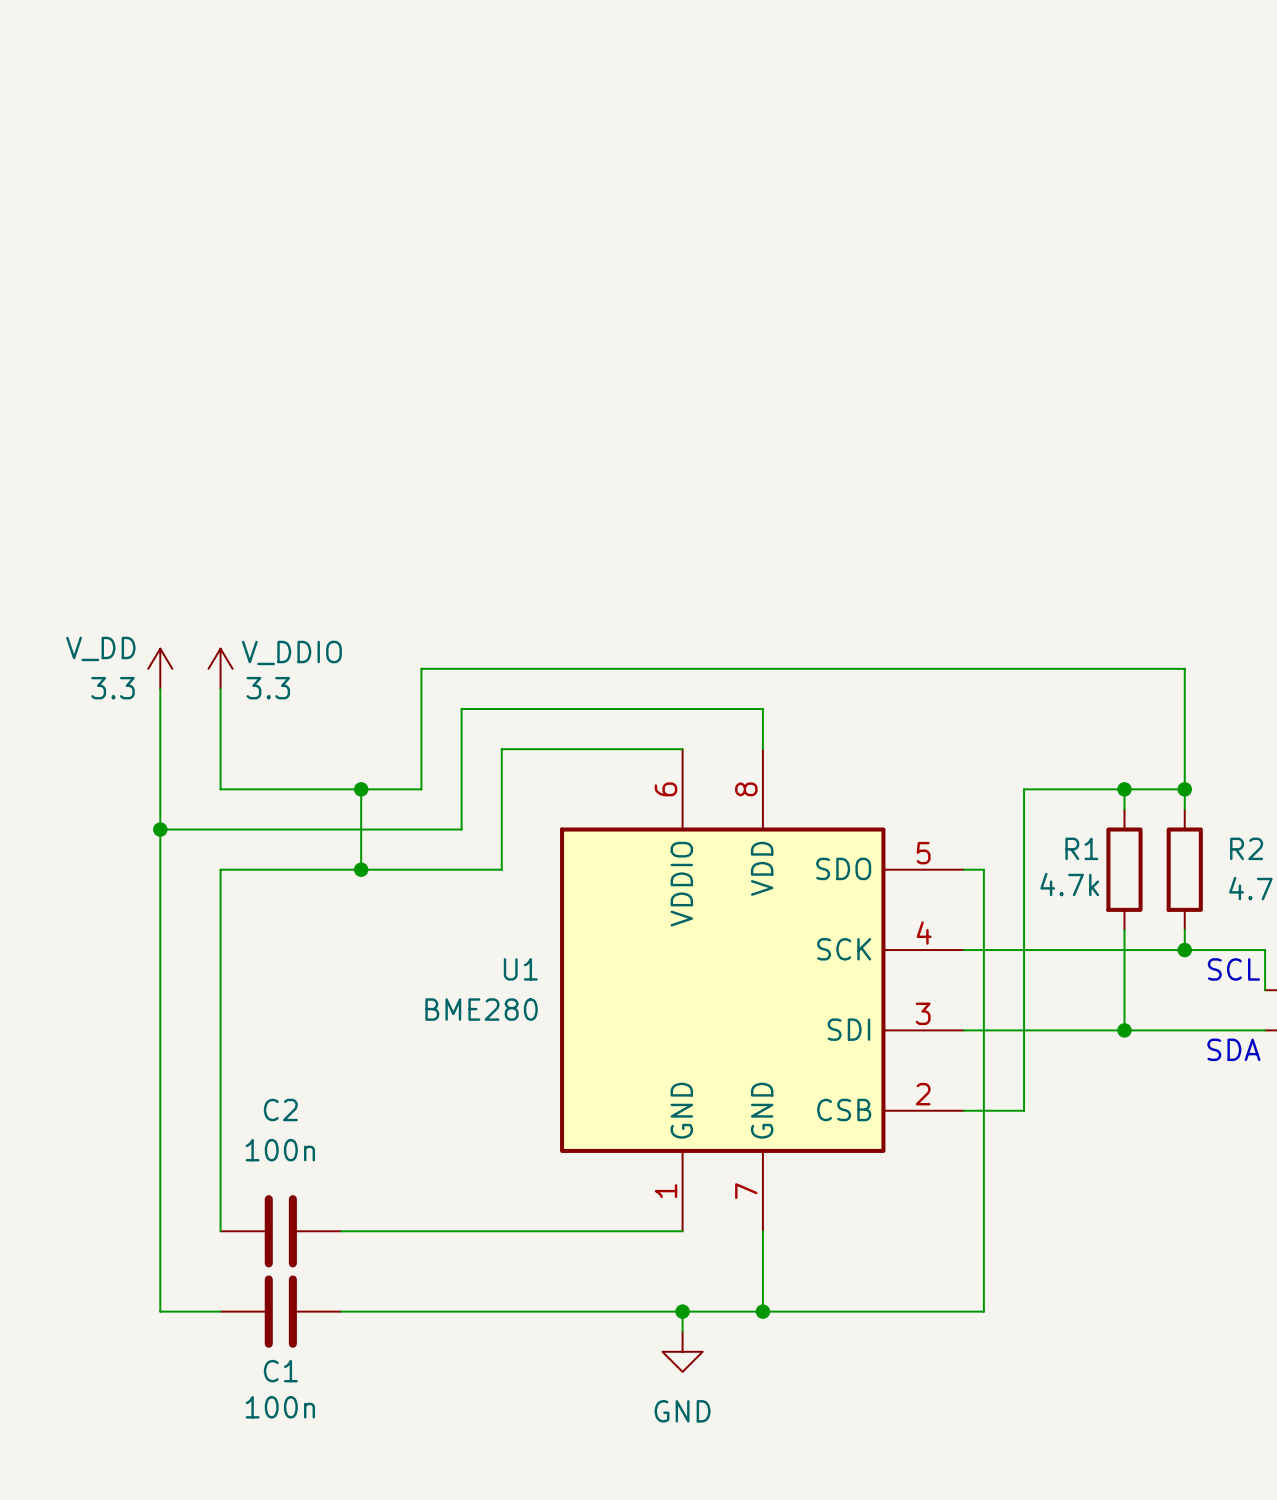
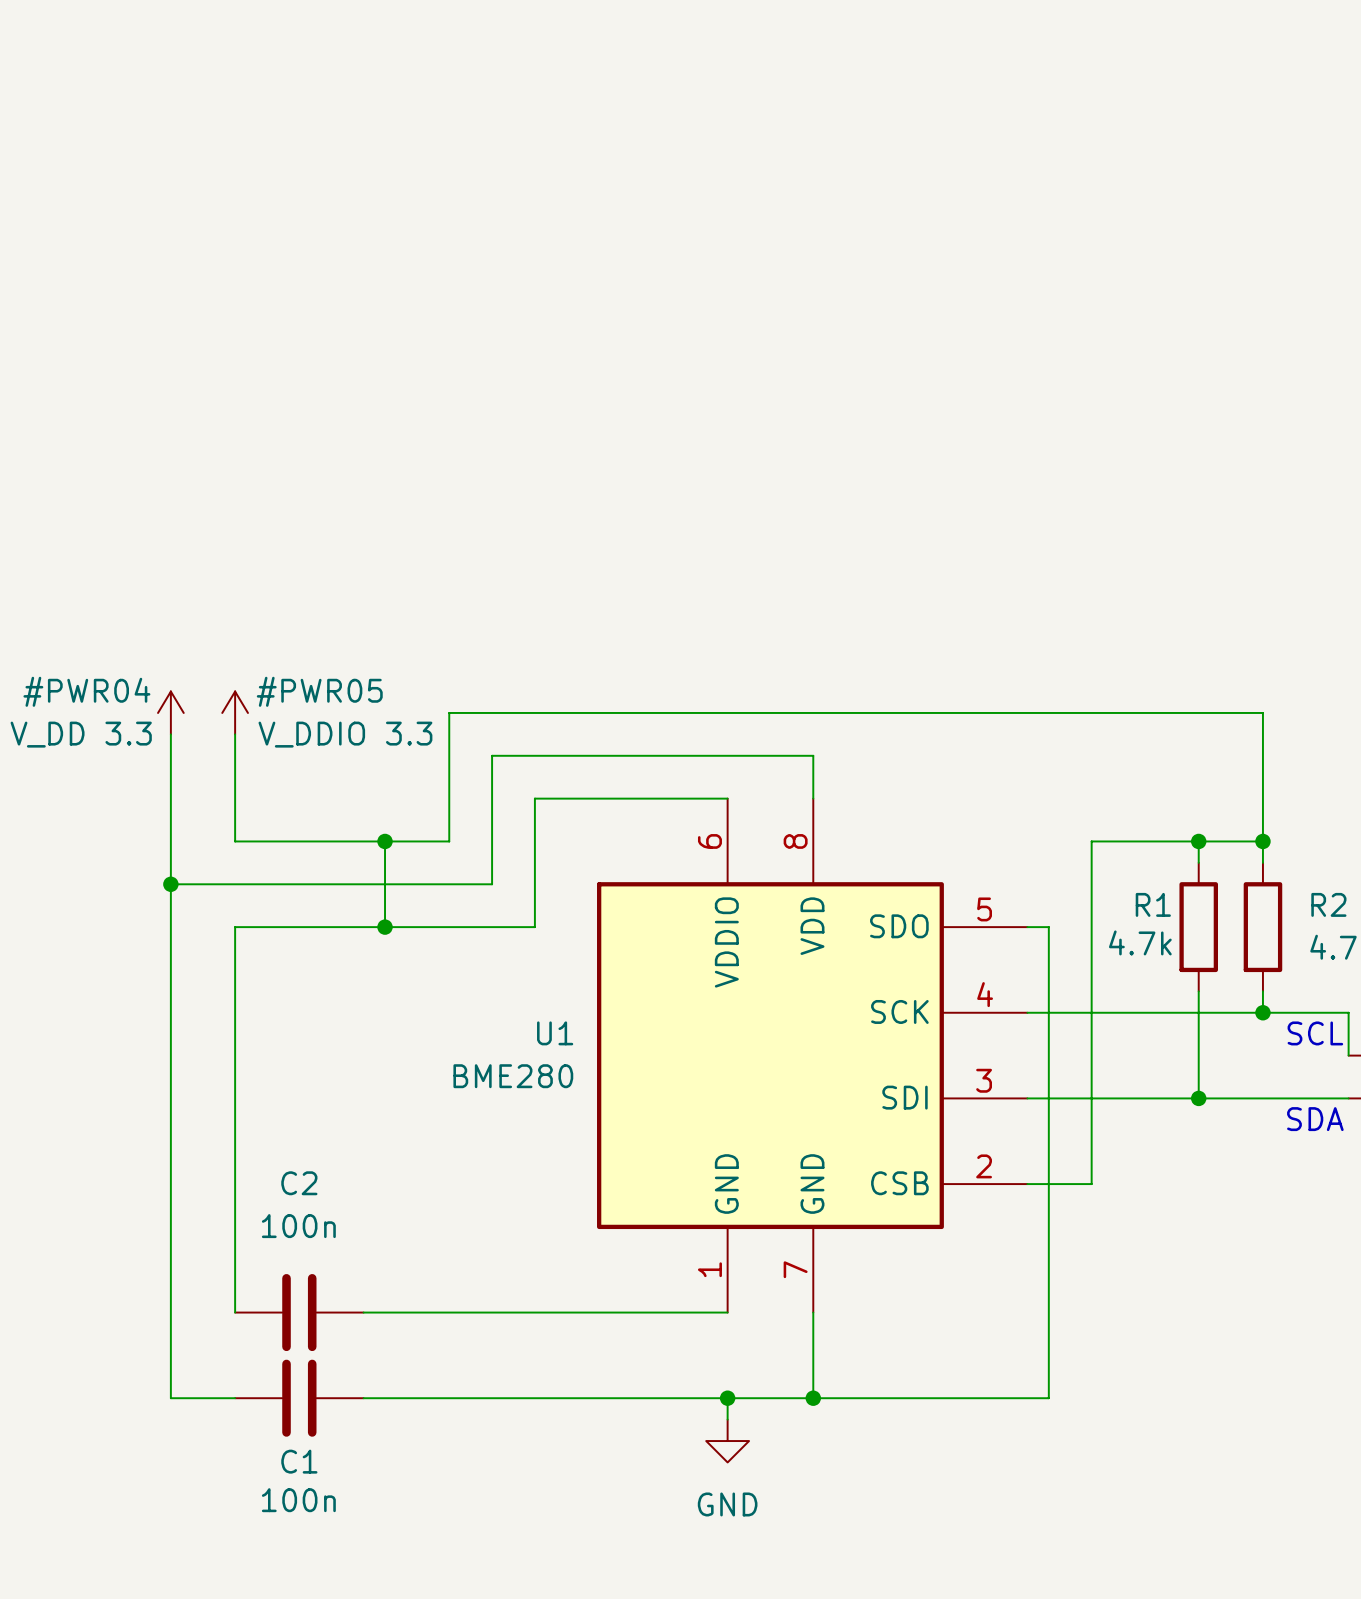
power symbol: 3.3 (160, 668) -> V_DD 3.3 (170, 712)
power symbol: 3.3 (220, 668) -> V_DDIO 3.3 (235, 712)

